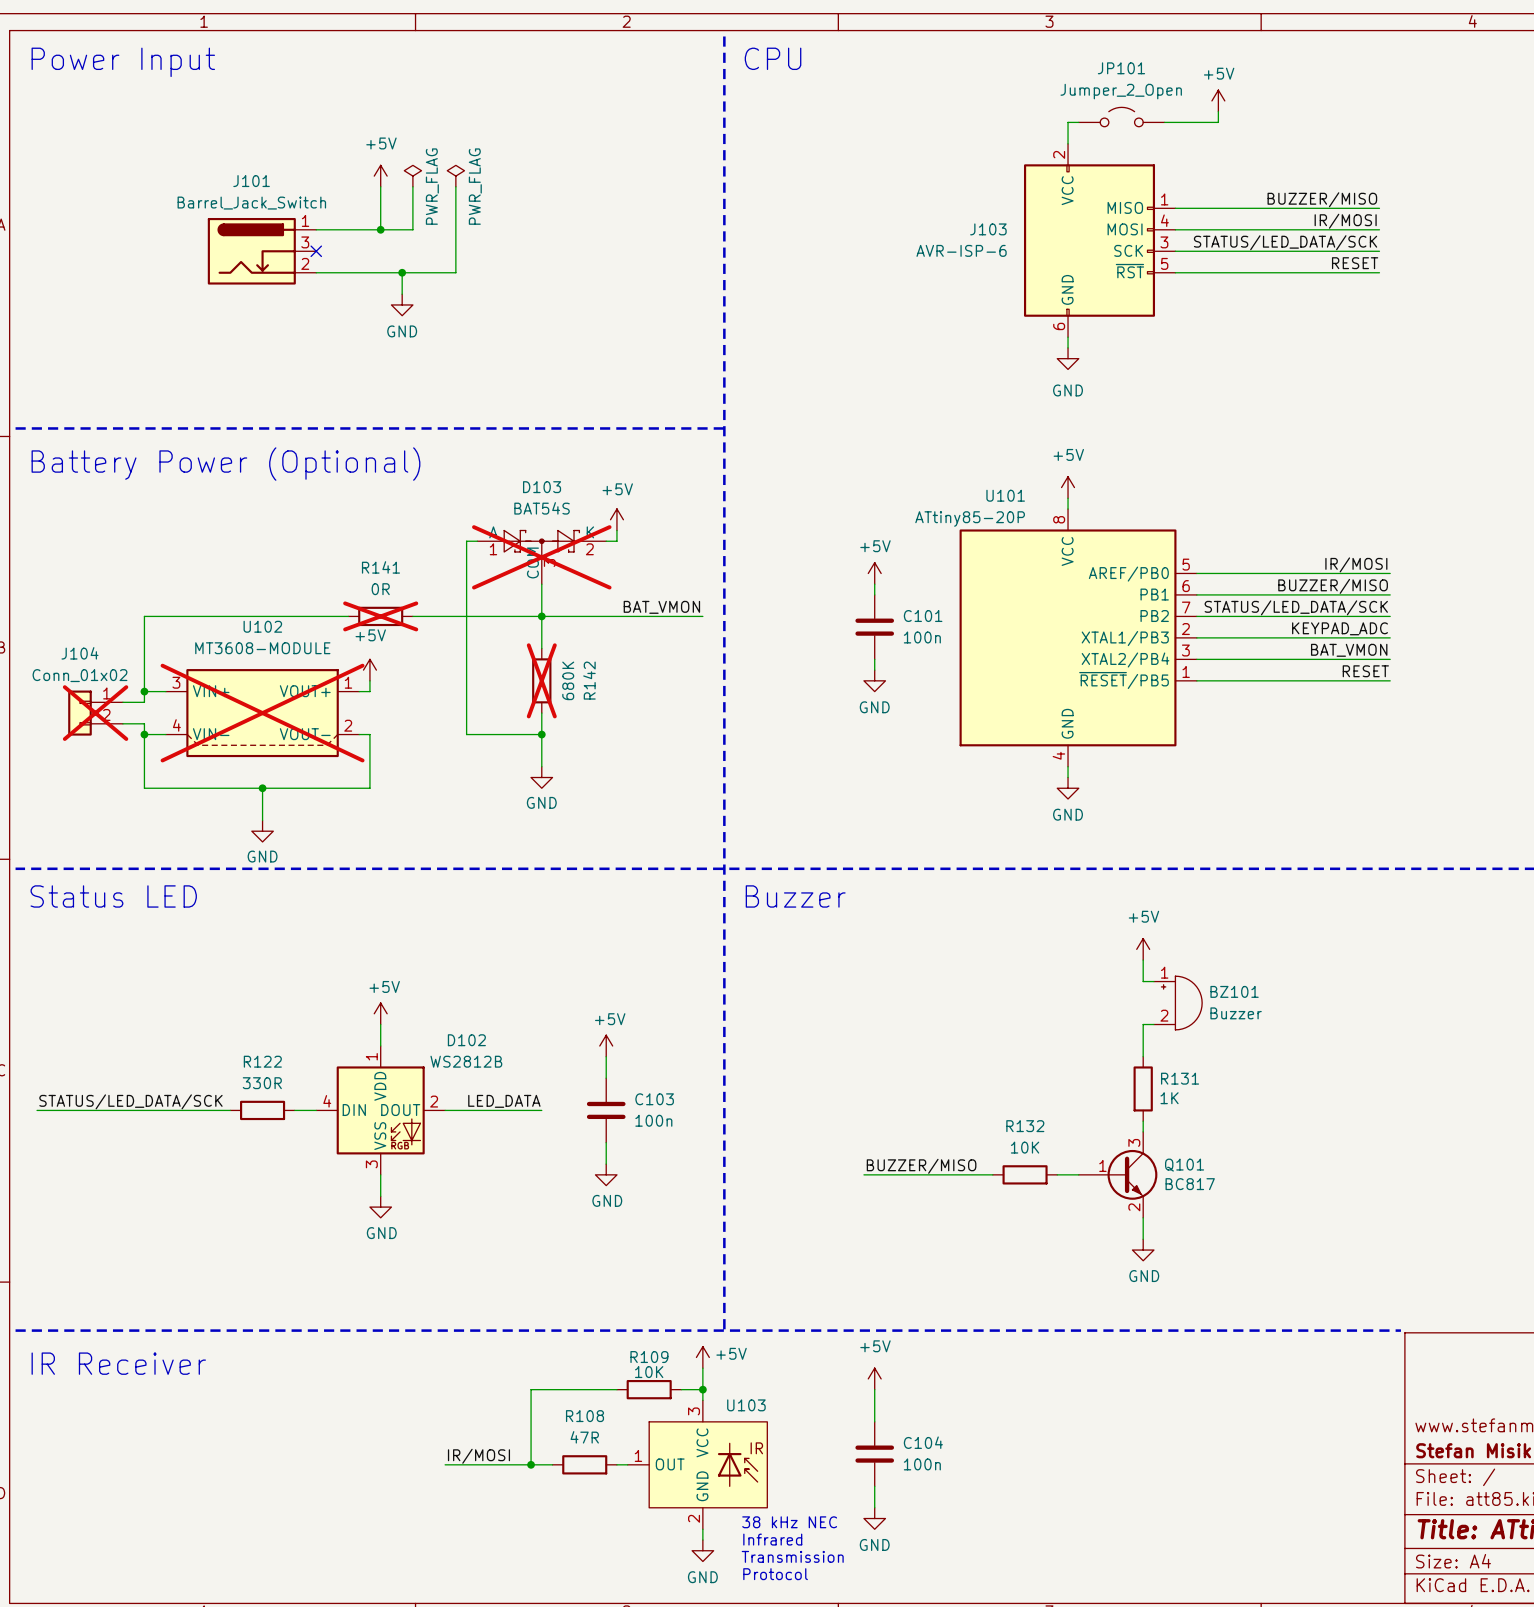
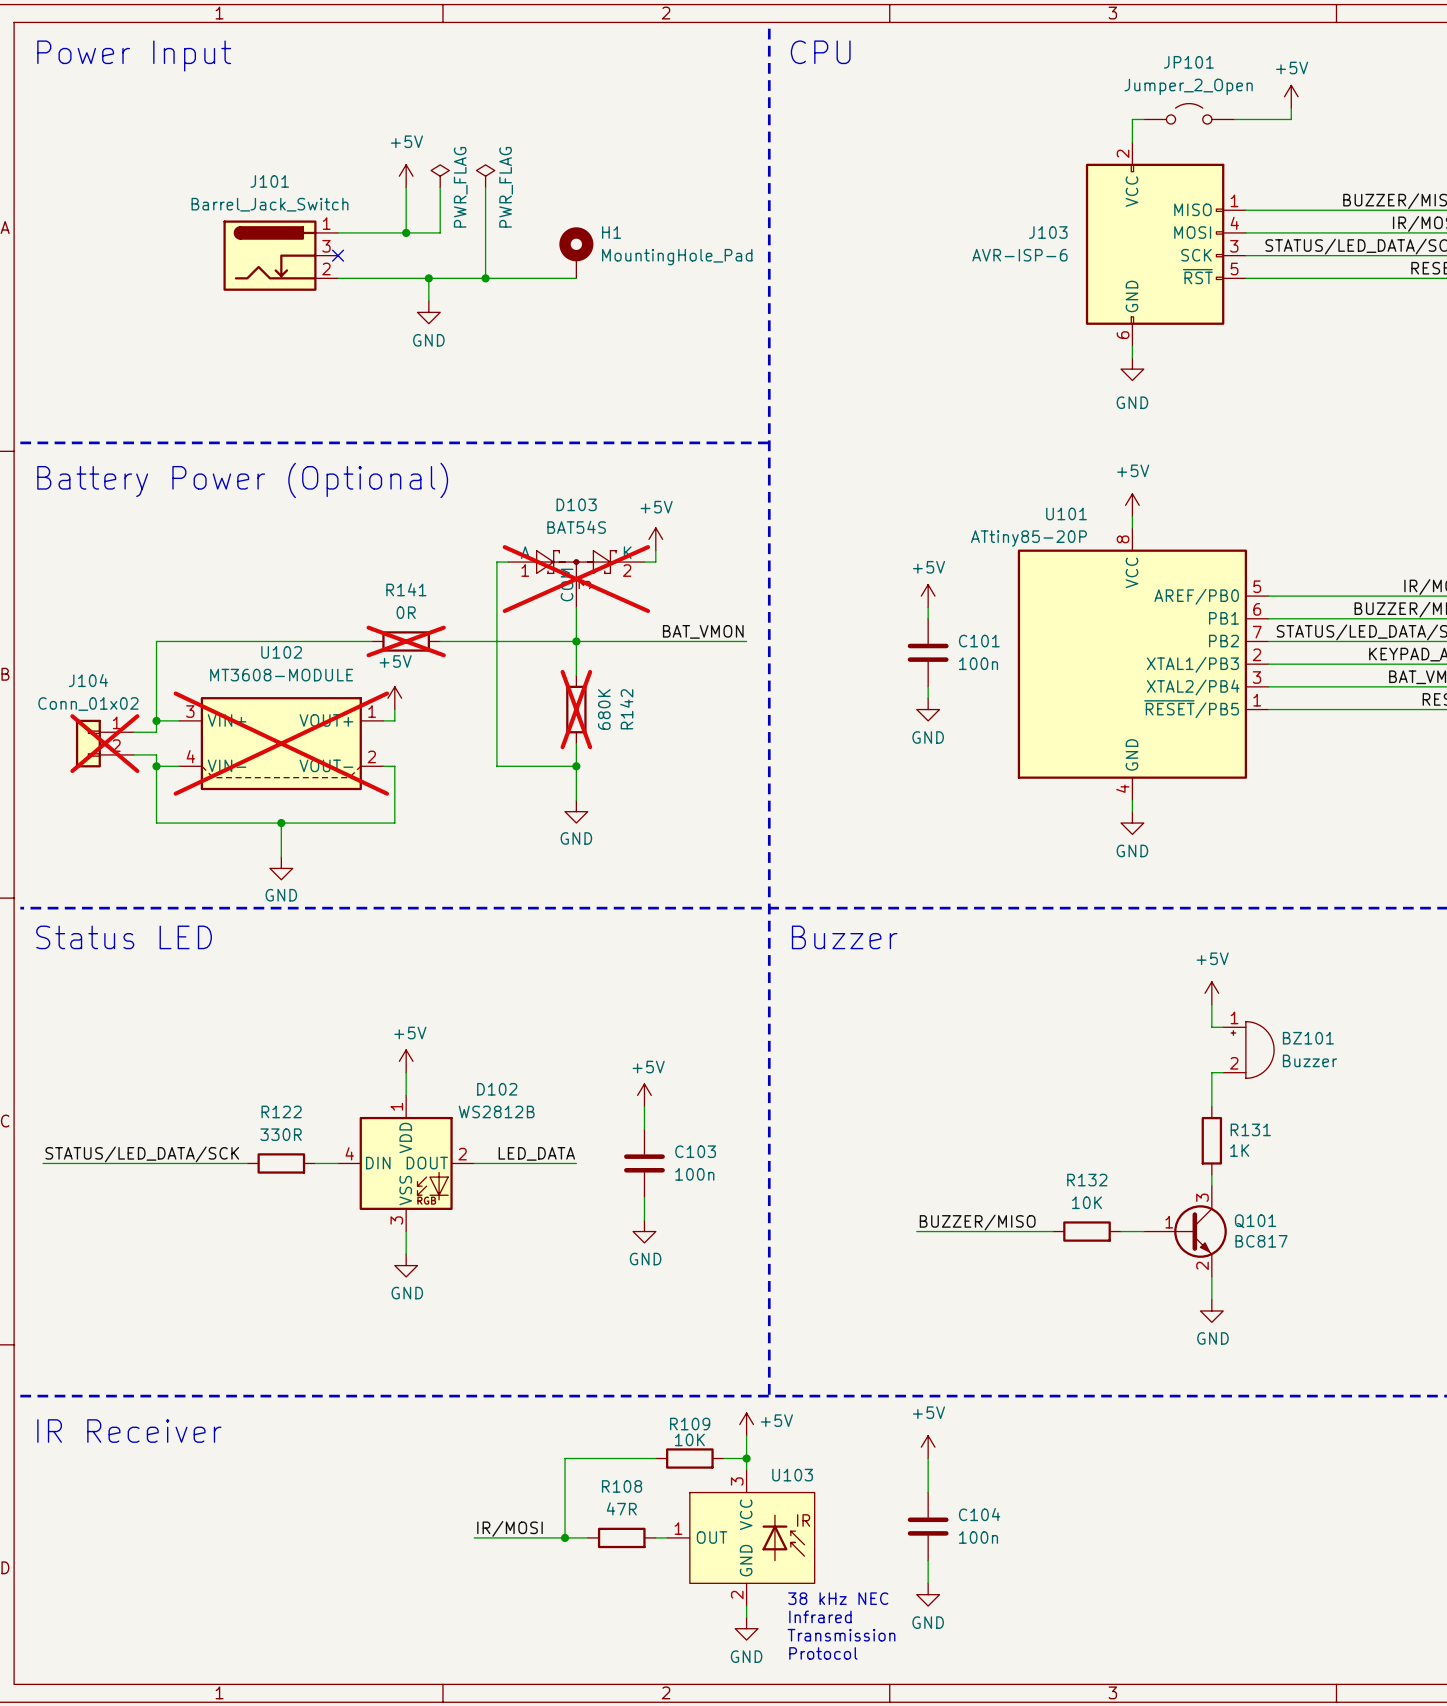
H1: none -> MountingHole_Pad (576, 252)
wire: none -> (485, 278) (576, 278)
junction: none -> (485, 278)

